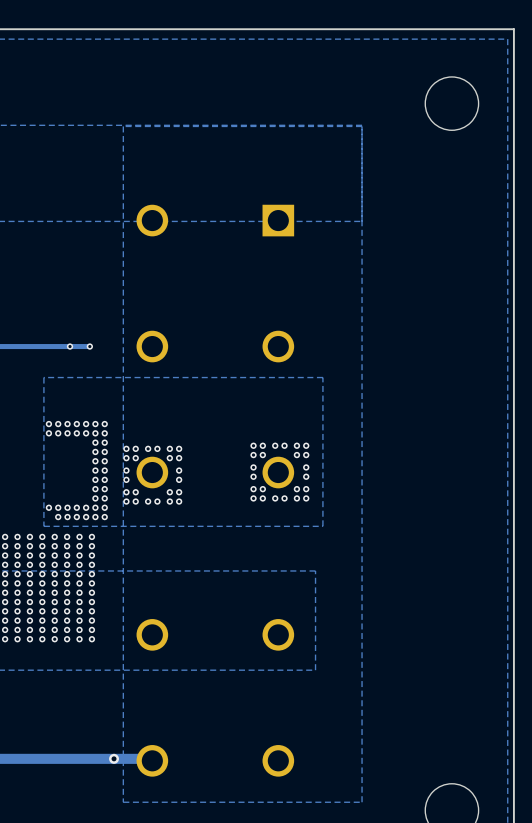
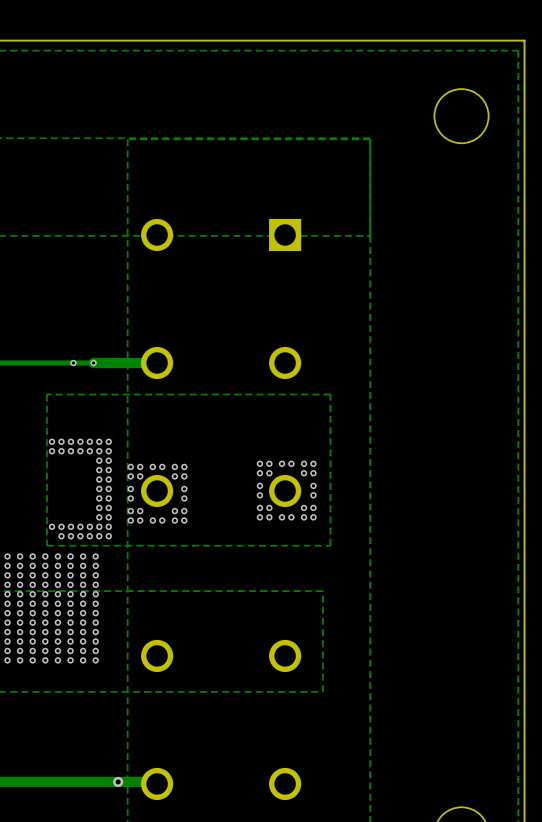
track: none -> (157, 363) (93, 363)

